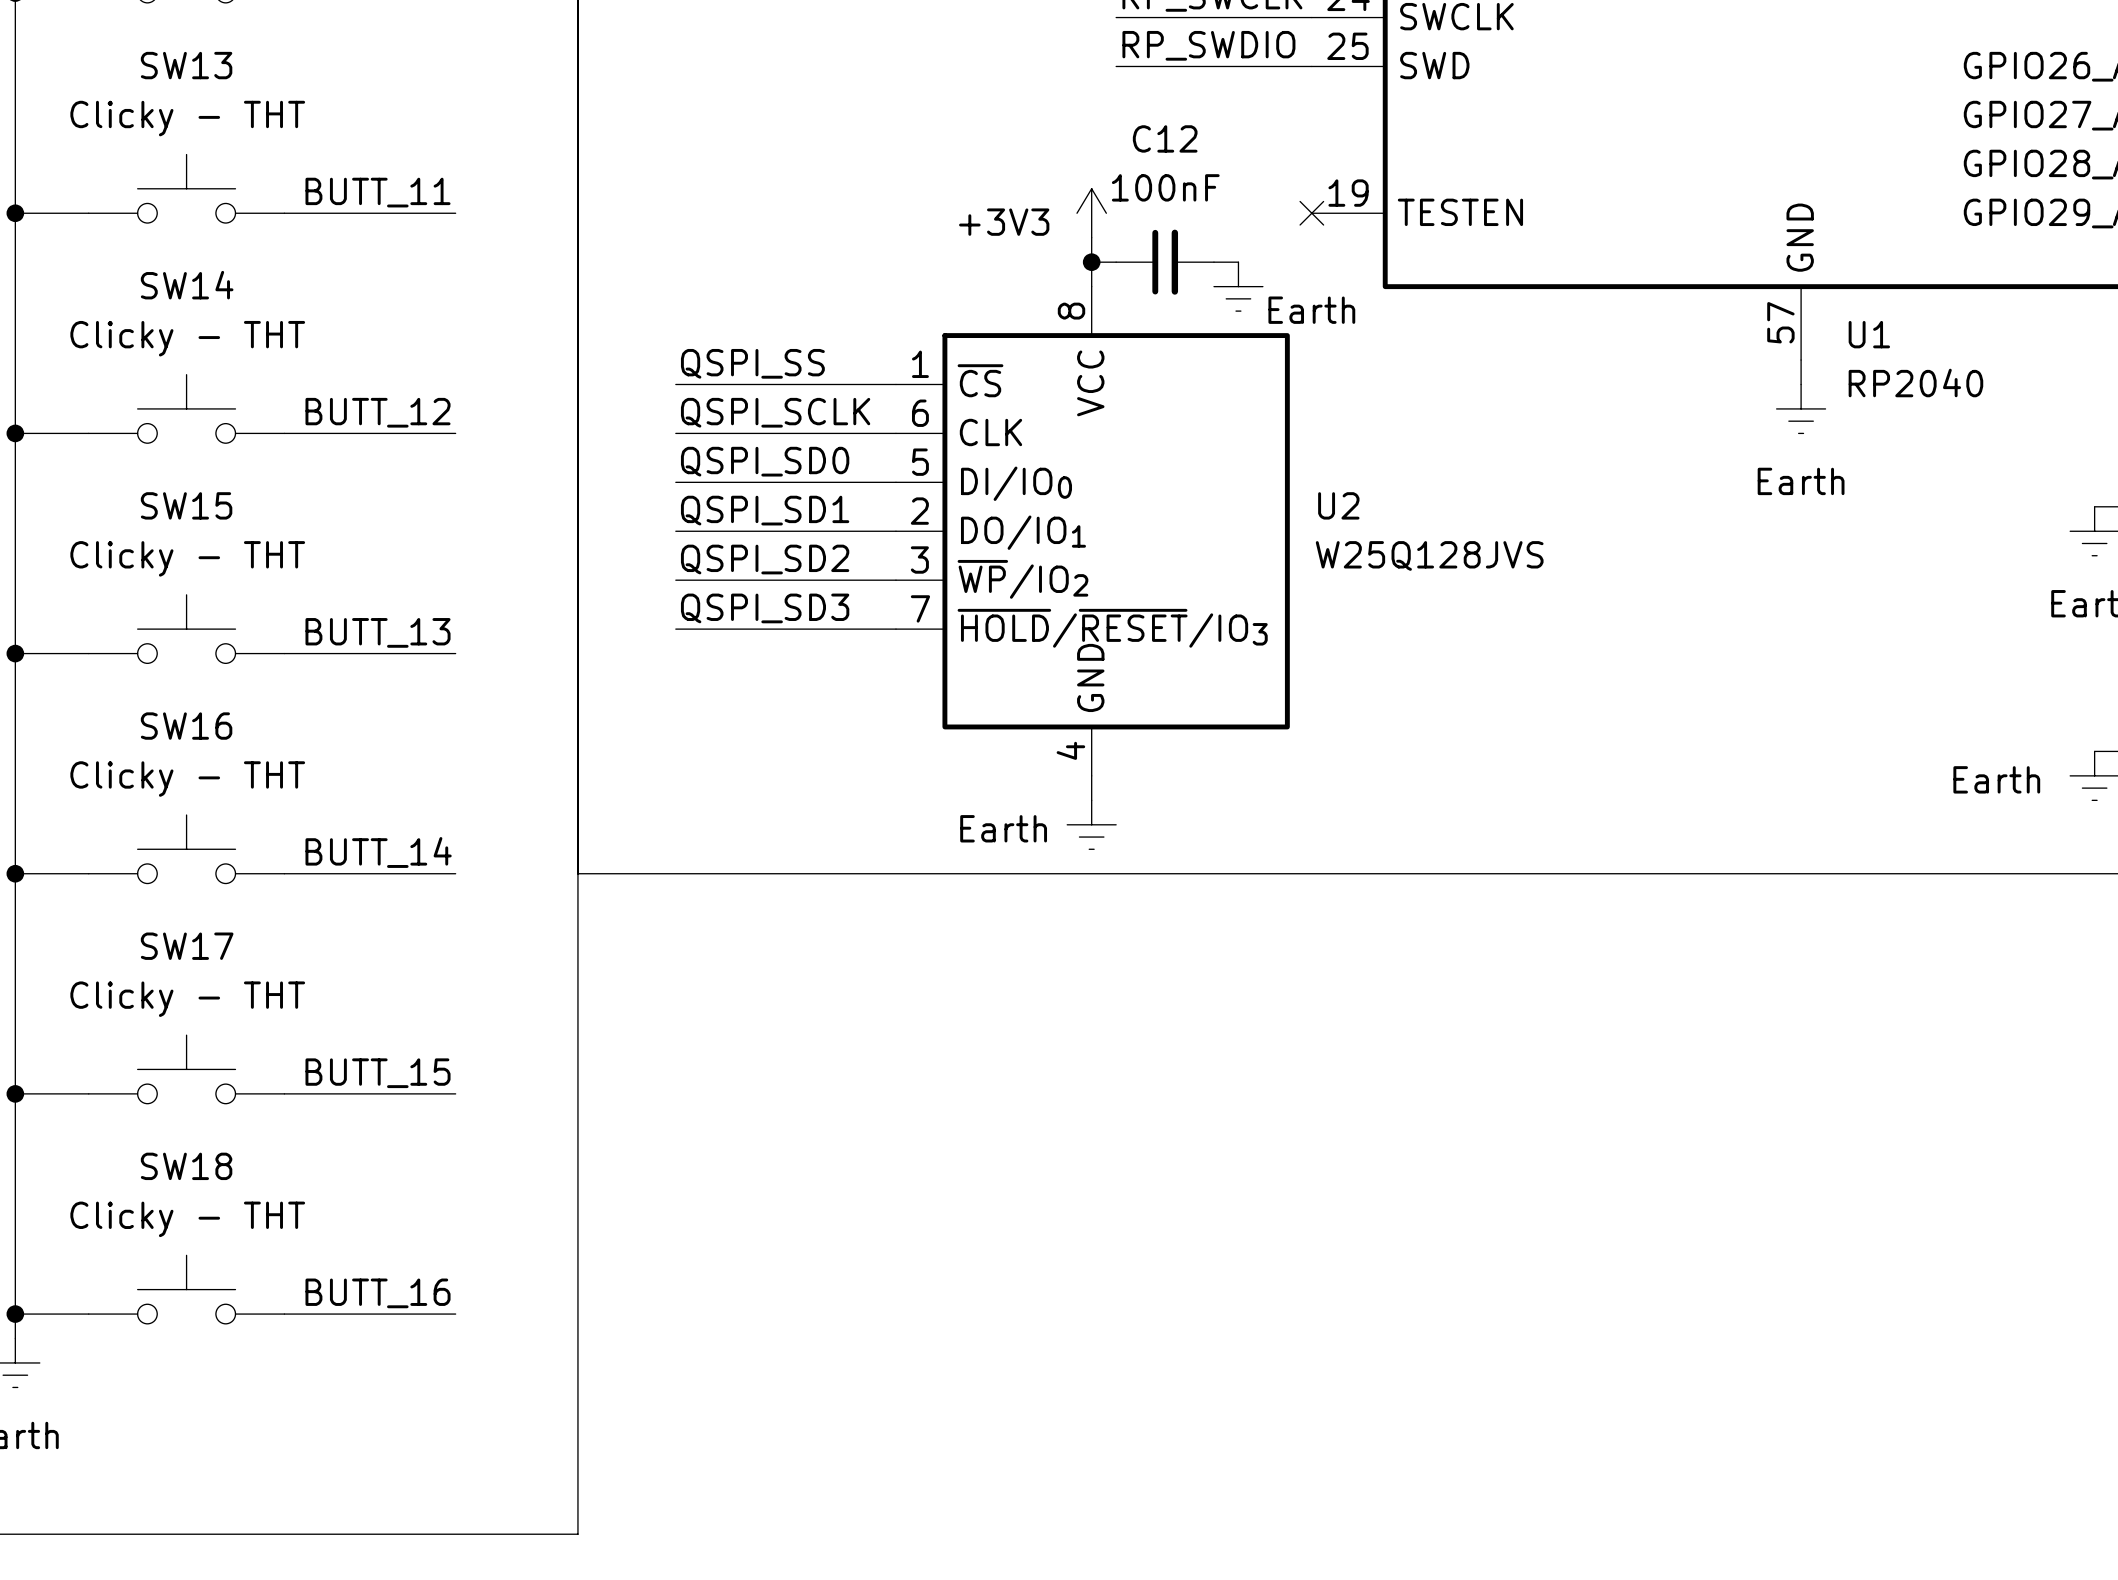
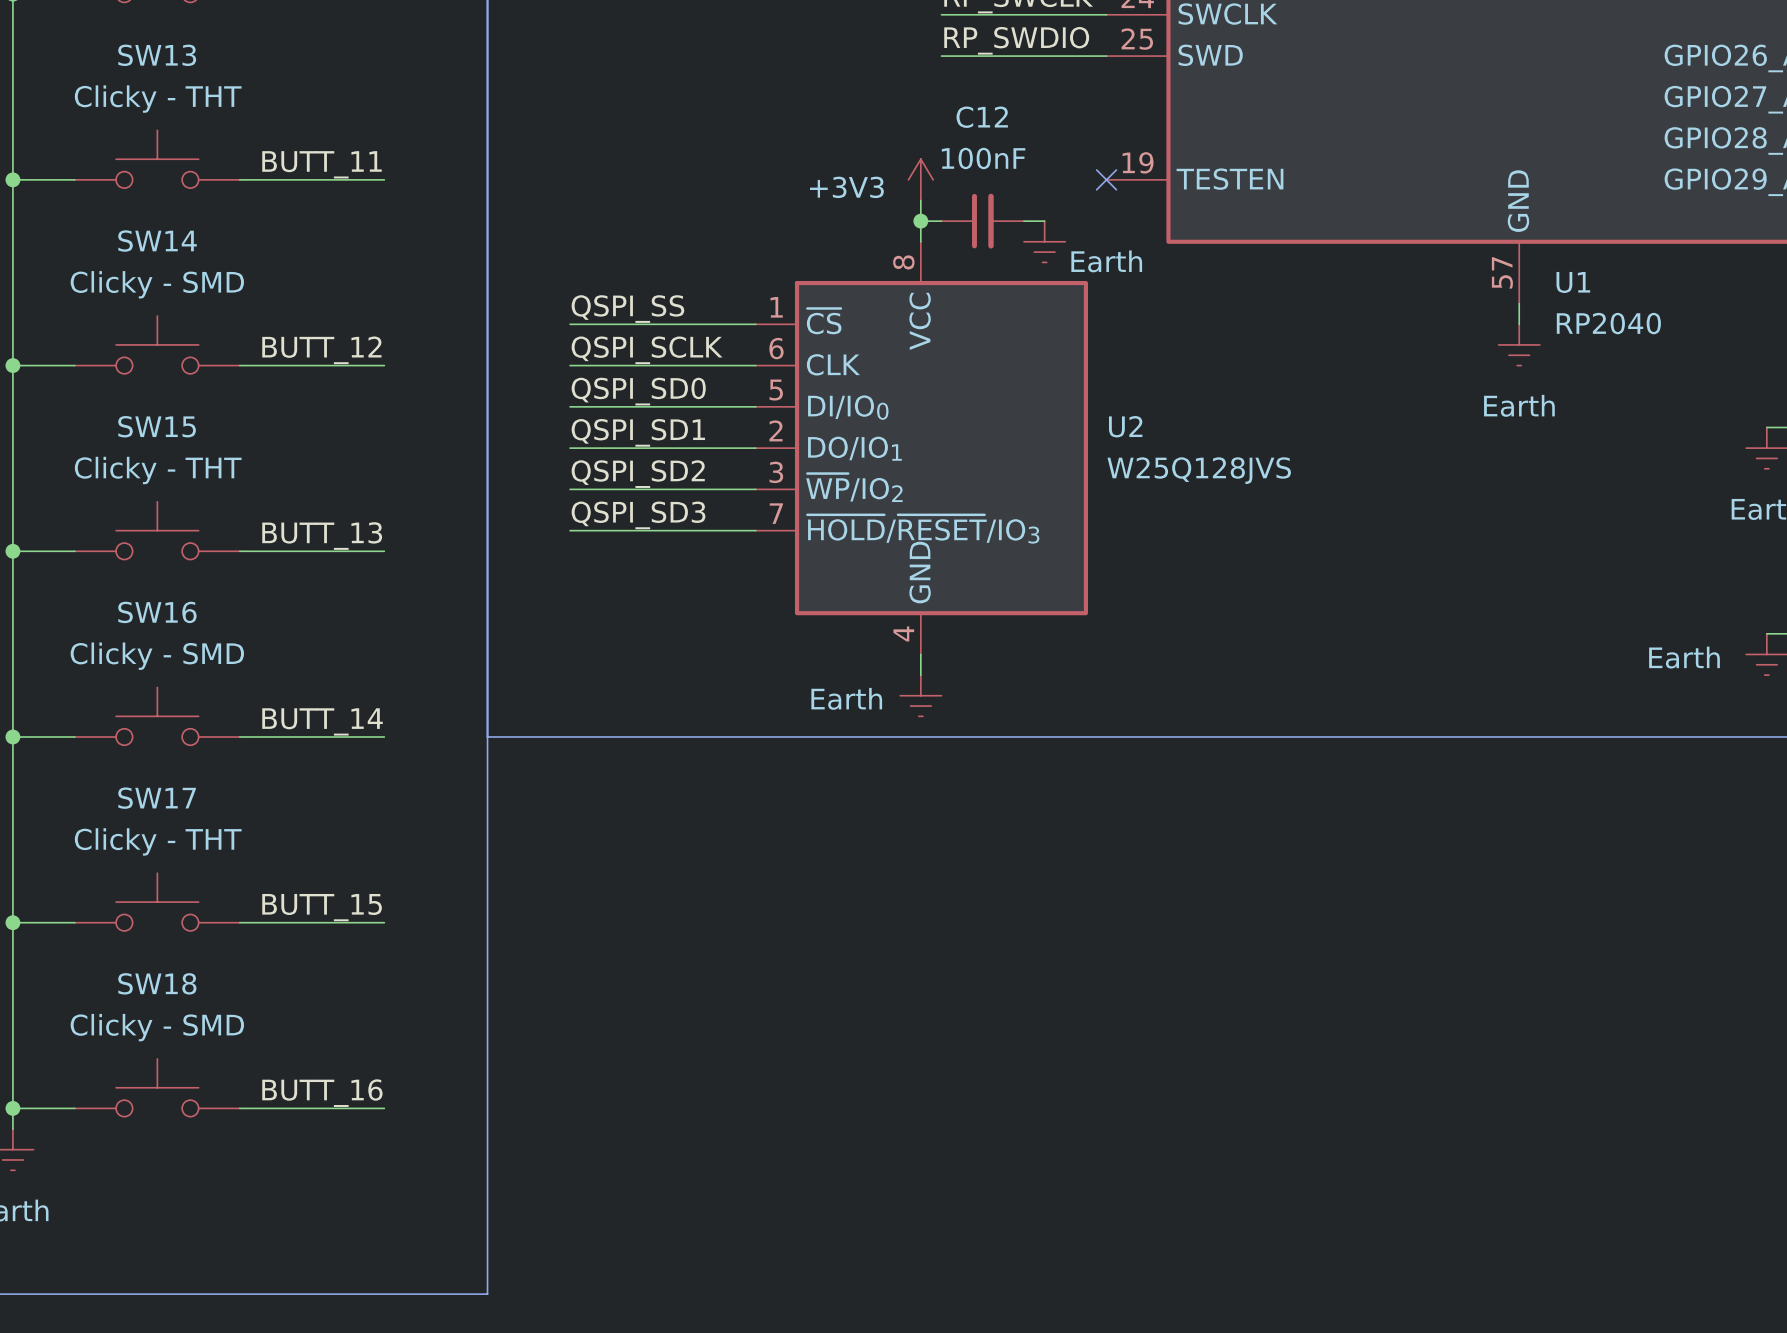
SW14 value: Clicky - THT (187, 338) -> Clicky - SMD (157, 284)
SW16 value: Clicky - THT (187, 779) -> Clicky - SMD (157, 656)
SW18 value: Clicky - THT (187, 1219) -> Clicky - SMD (157, 1027)

